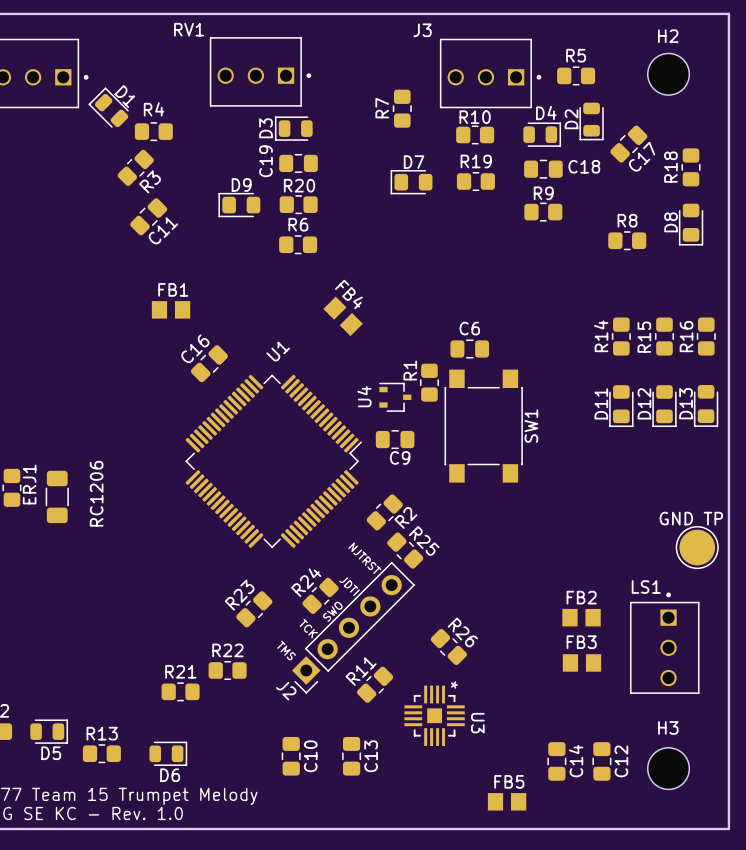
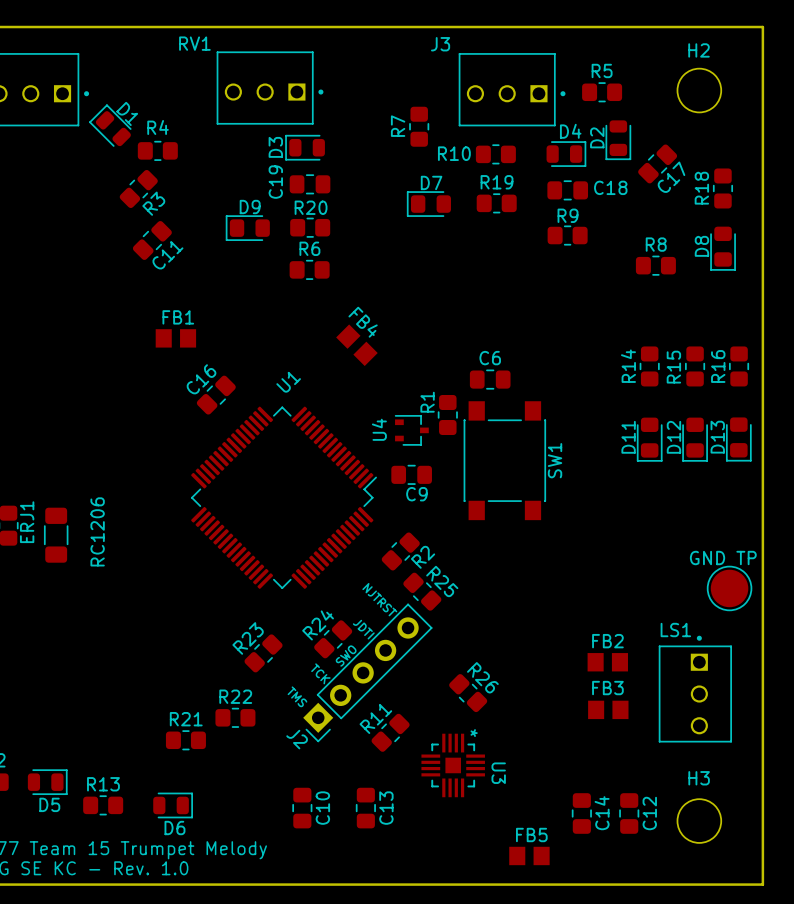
R10 name position: R10 (475, 117) -> R10 (454, 153)

